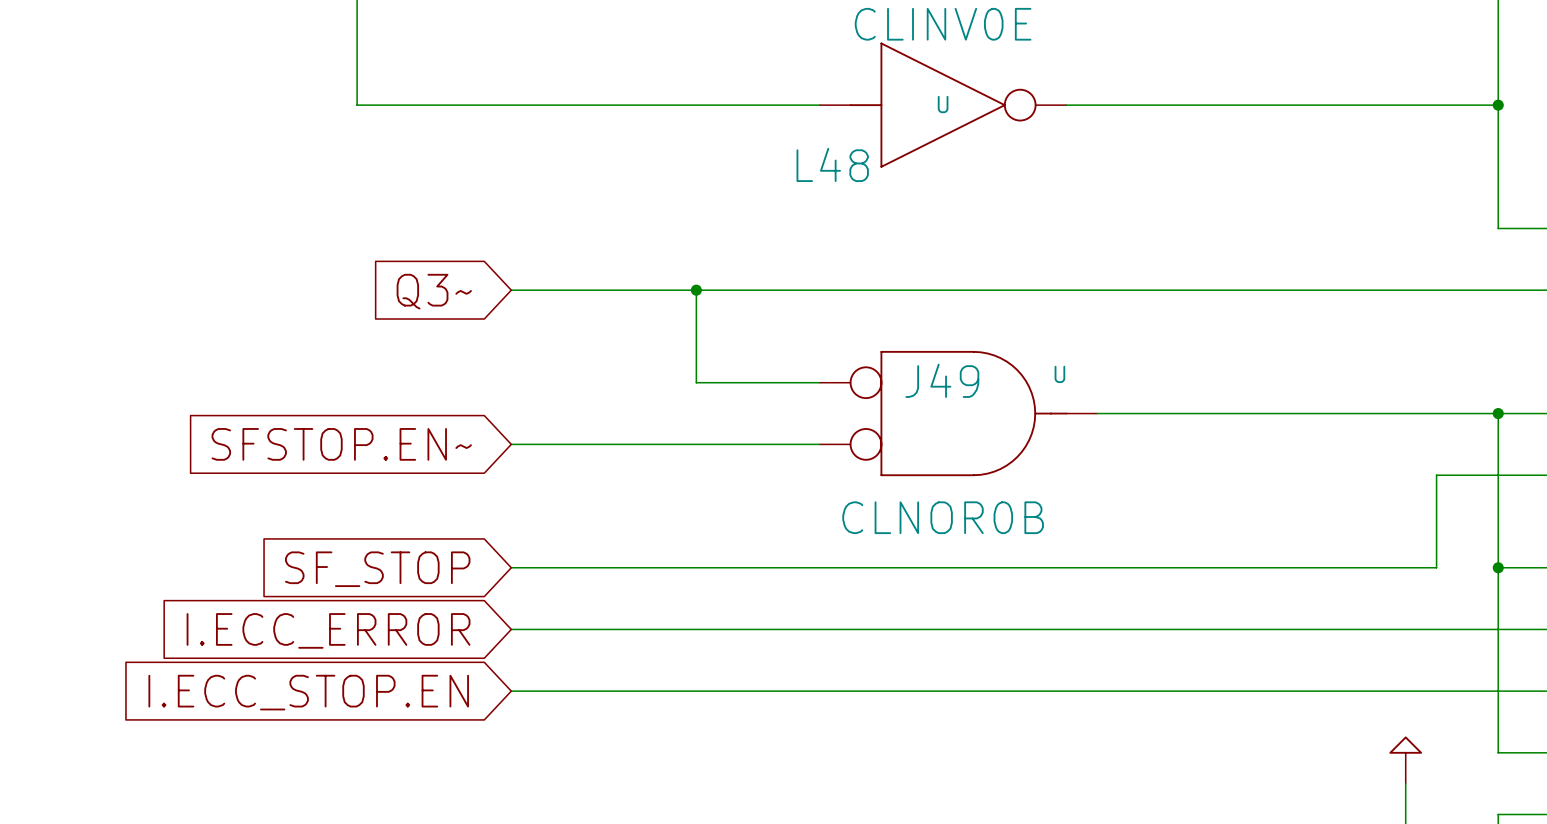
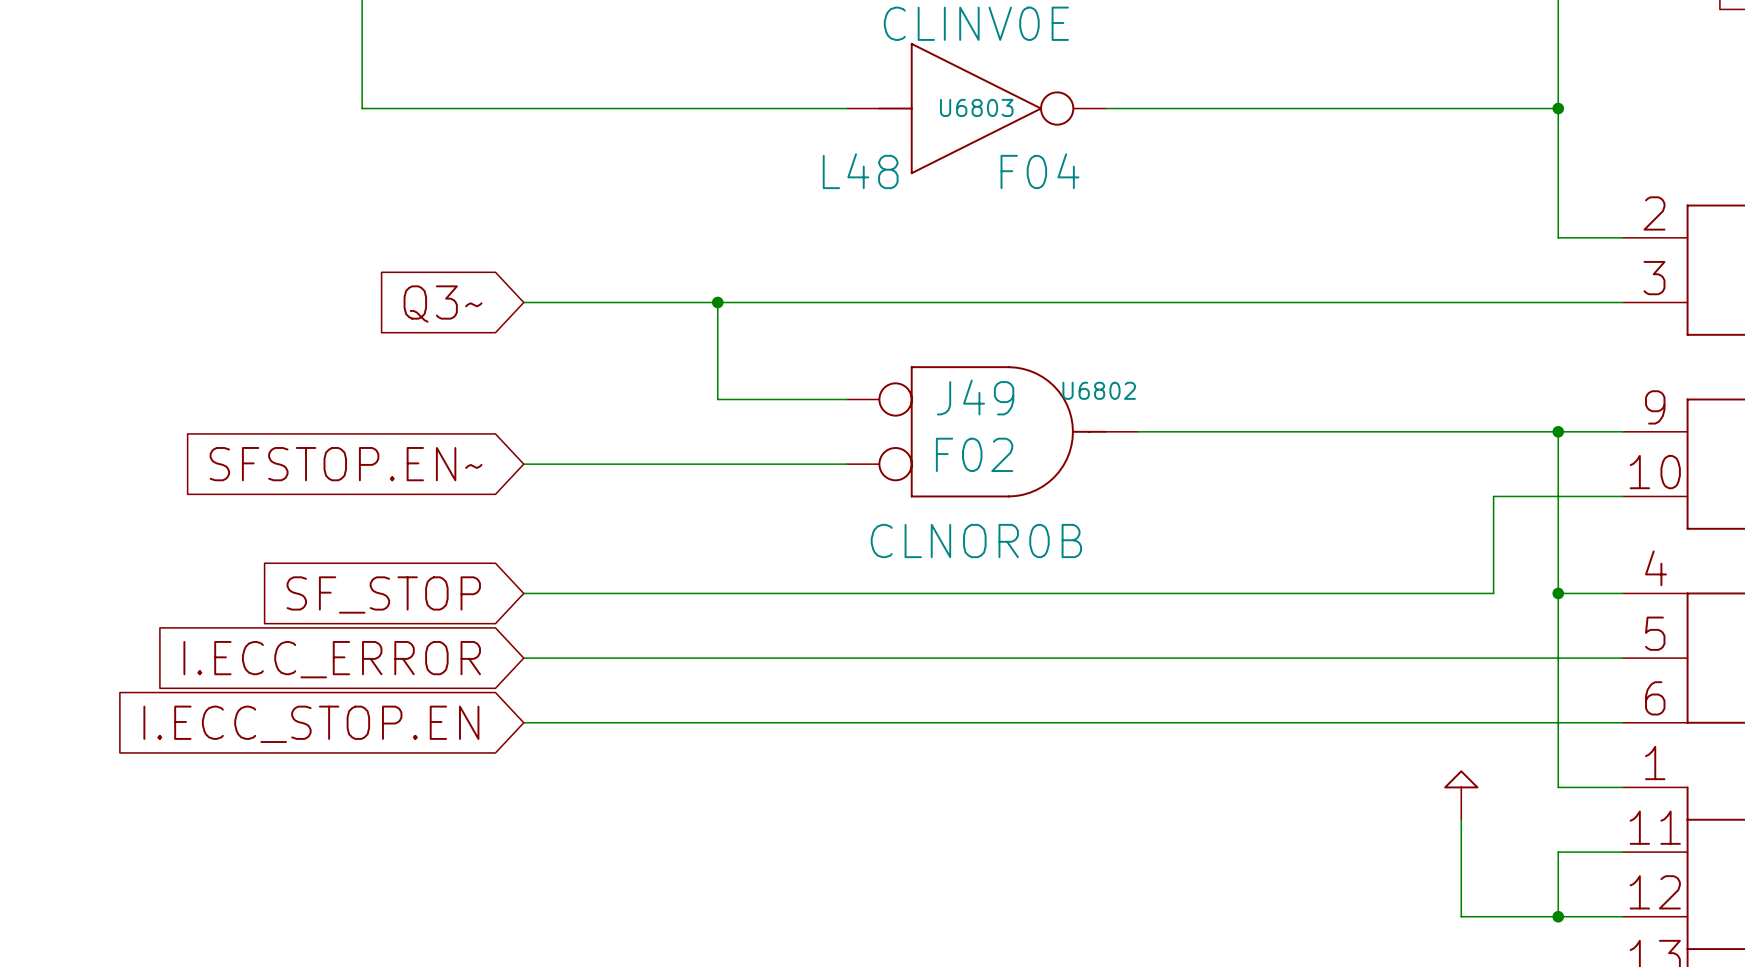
U name: U (943, 104) -> U6803 (976, 107)
U value: none -> F04 (1039, 171)
U name: U (1059, 374) -> U6802 (1099, 390)
U value: none -> F02 (974, 454)

